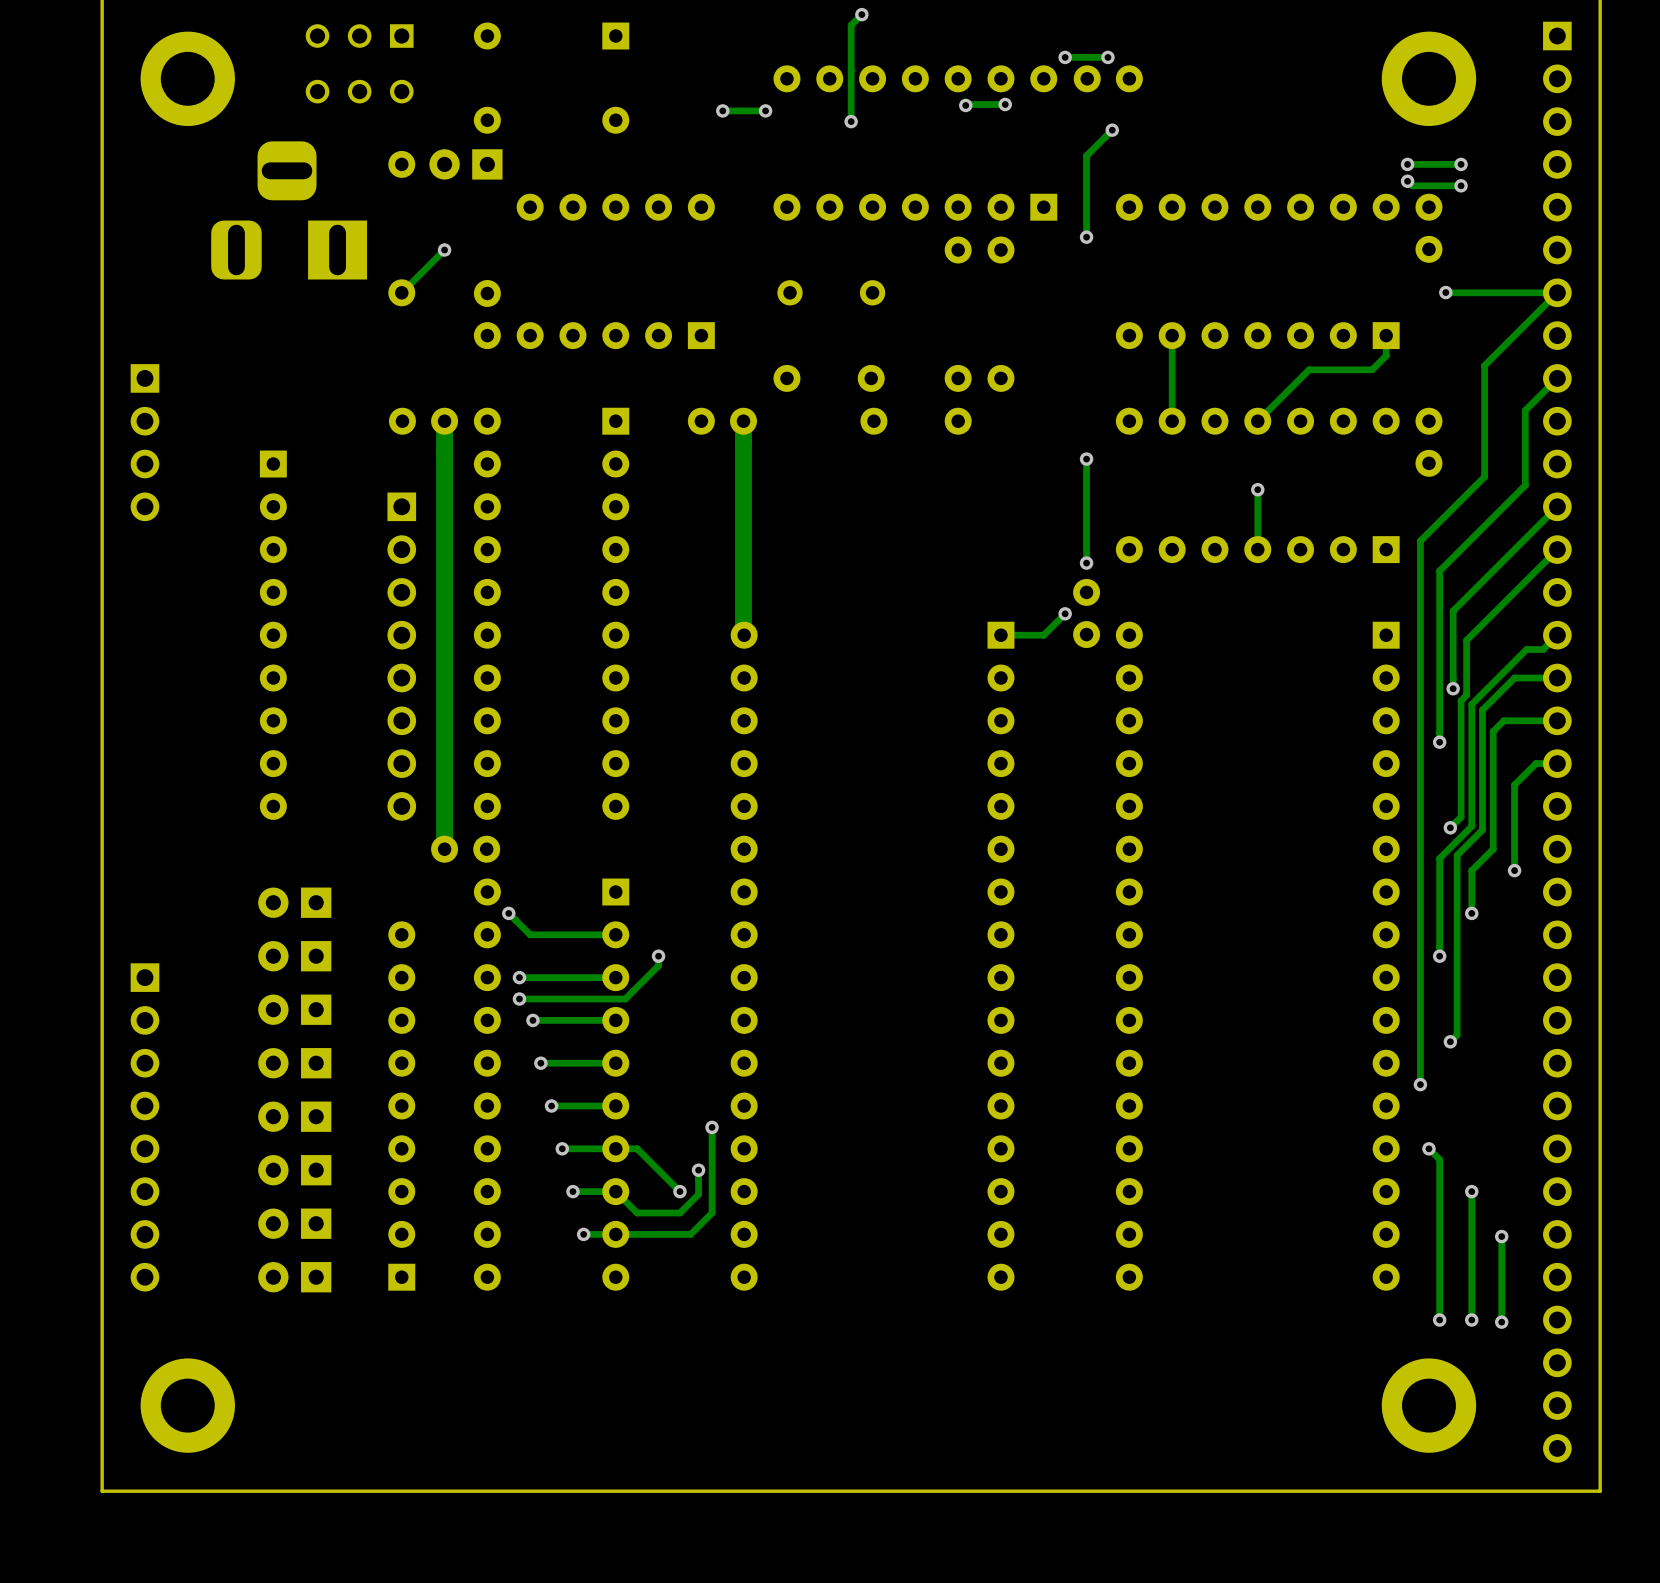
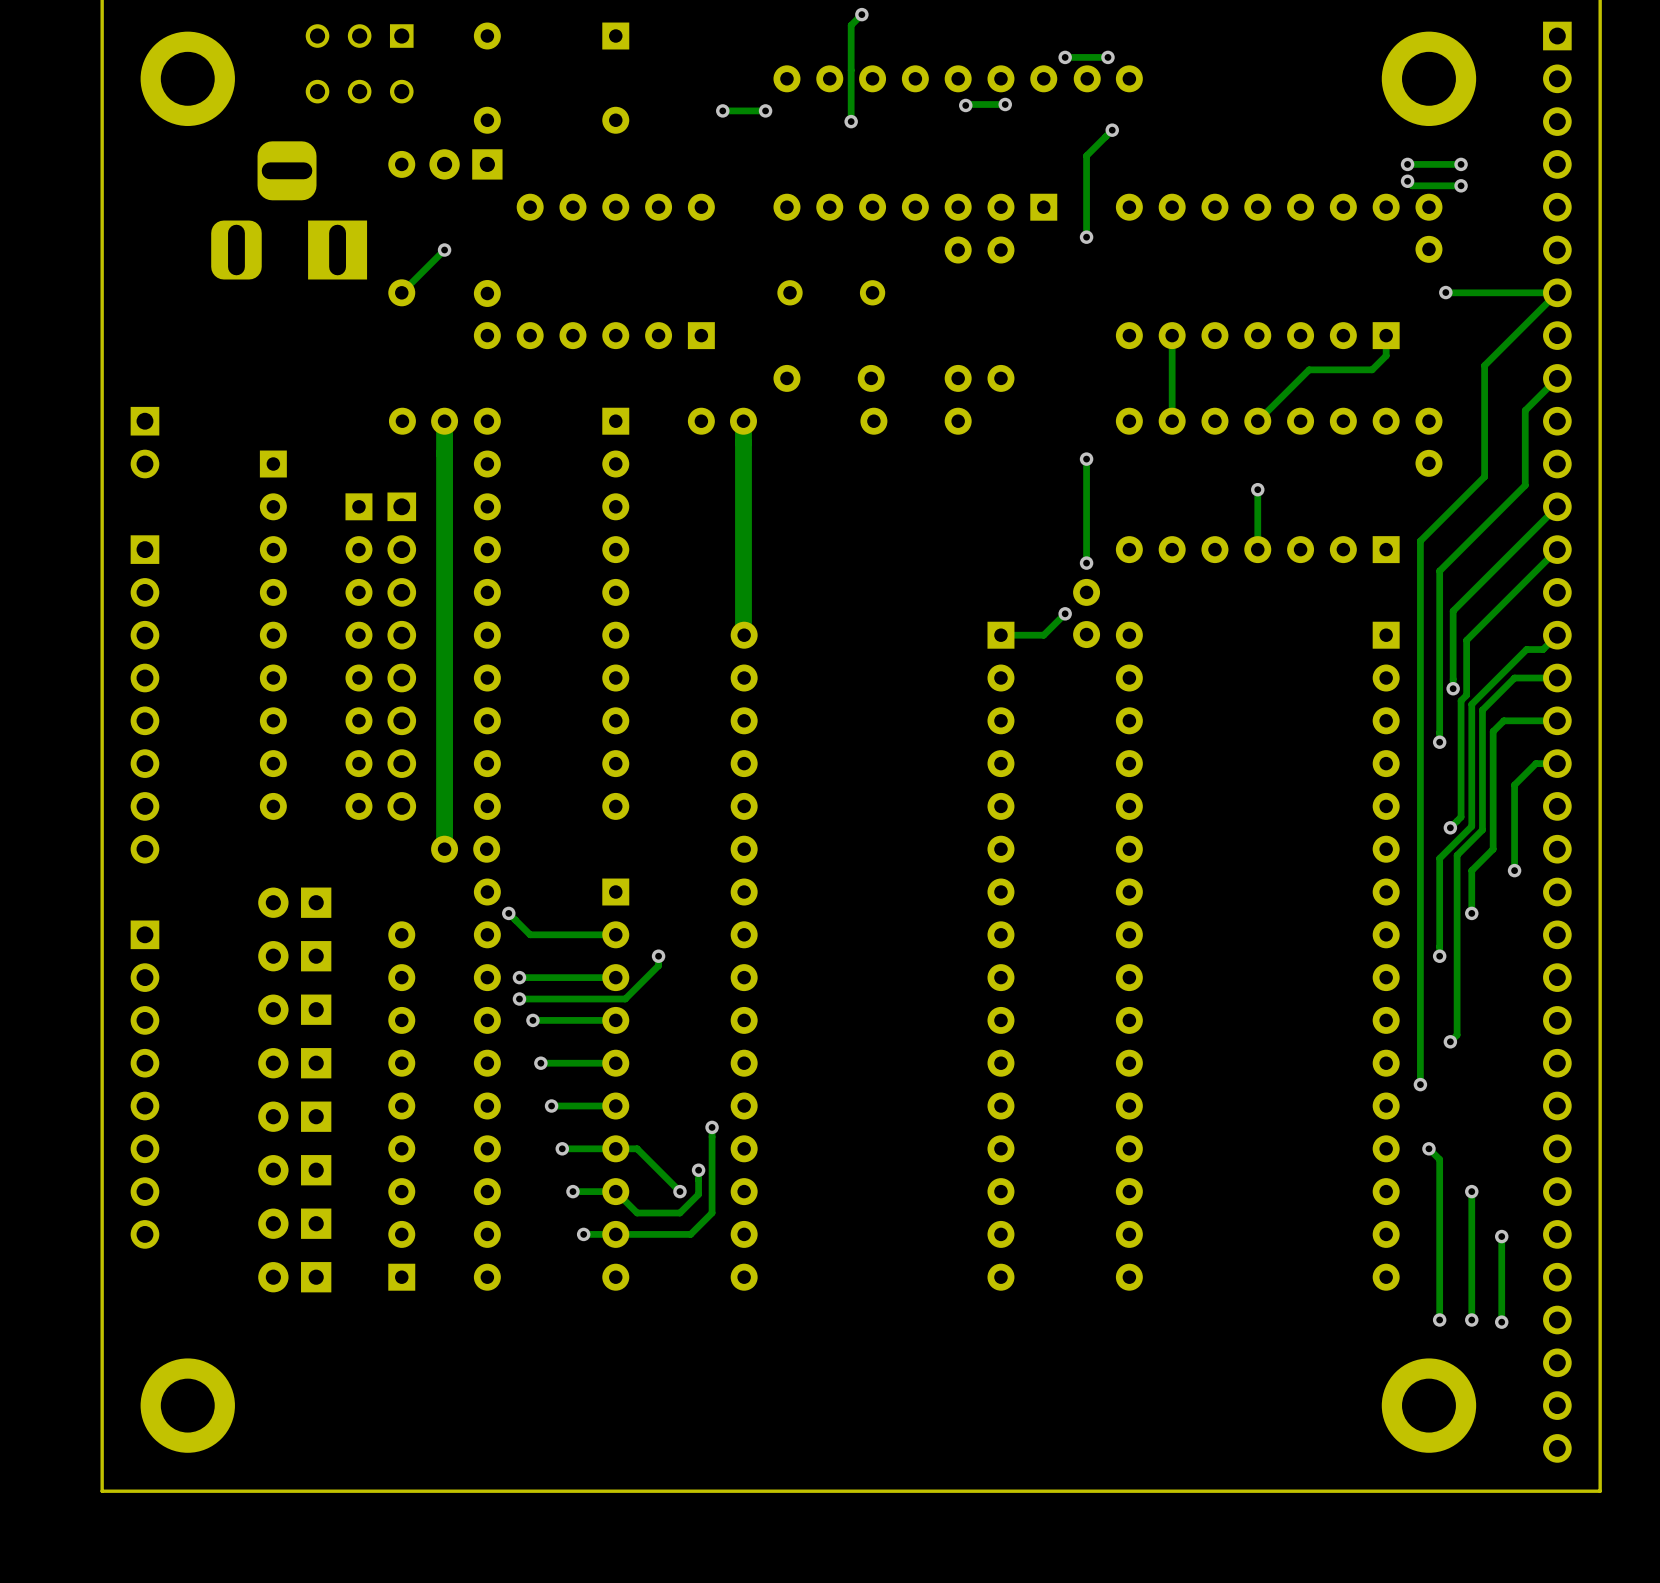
part footprint: [130, 364, 160, 522] -> [130, 406, 160, 479]
part: none -> (358, 656)
part: none -> (144, 699)
part position: (144, 1127) -> (144, 1084)

